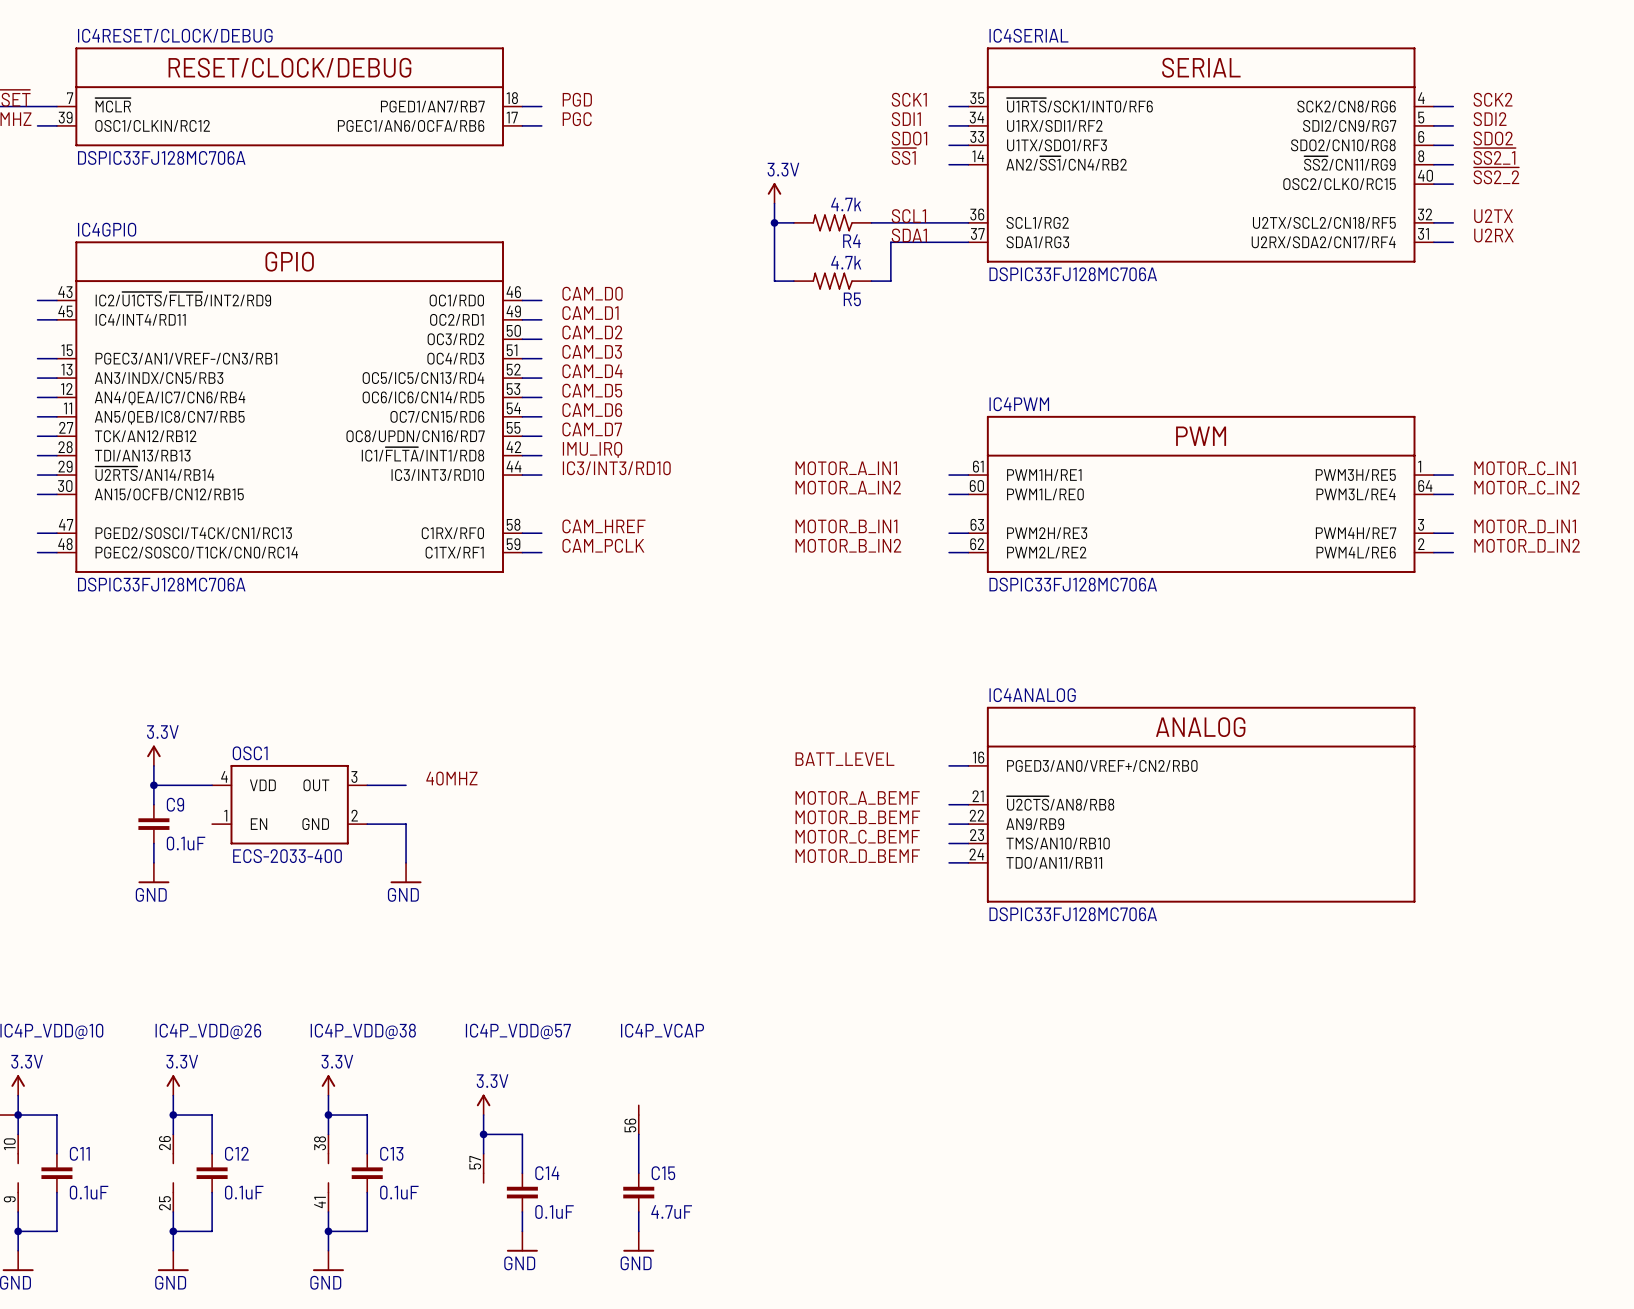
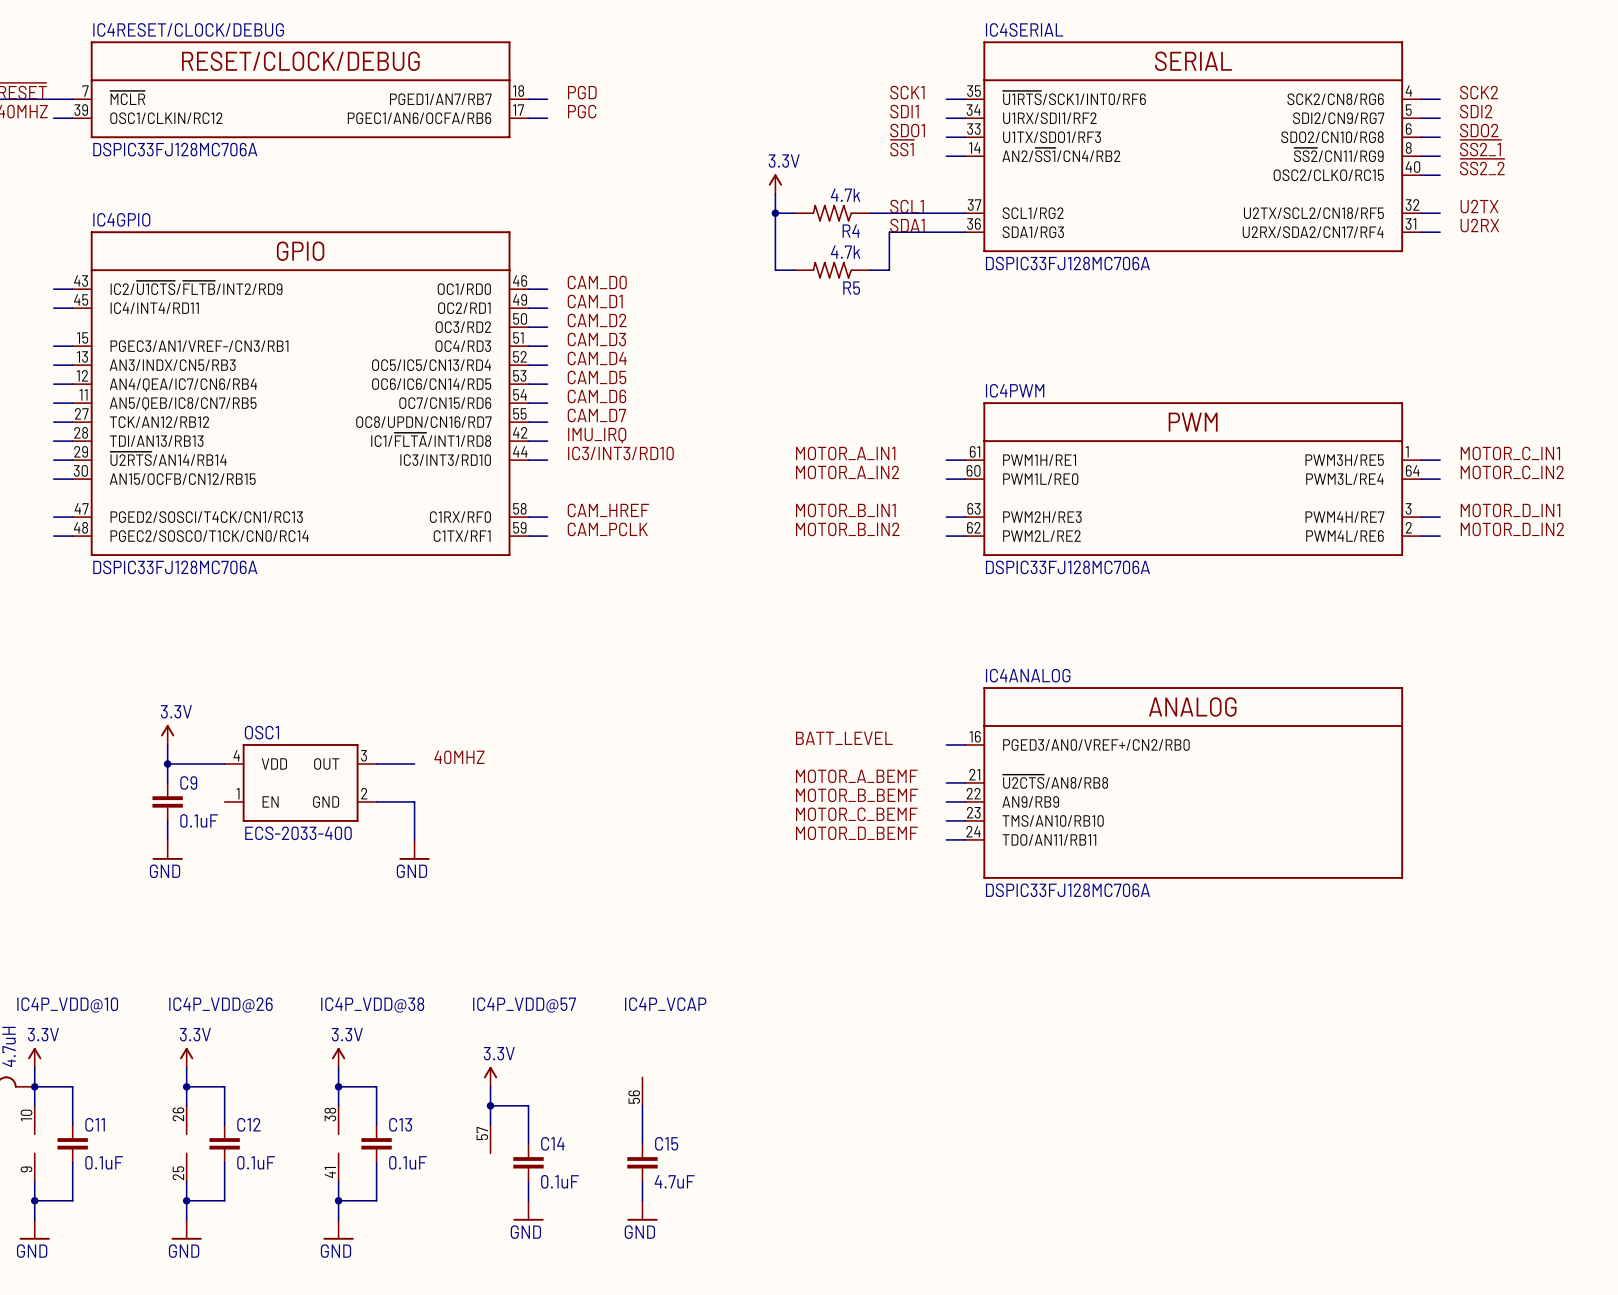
IC4SERIAL pin number: 36 (977, 214) -> 37 (974, 205)
IC4SERIAL pin number: 37 (977, 233) -> 36 (974, 223)

